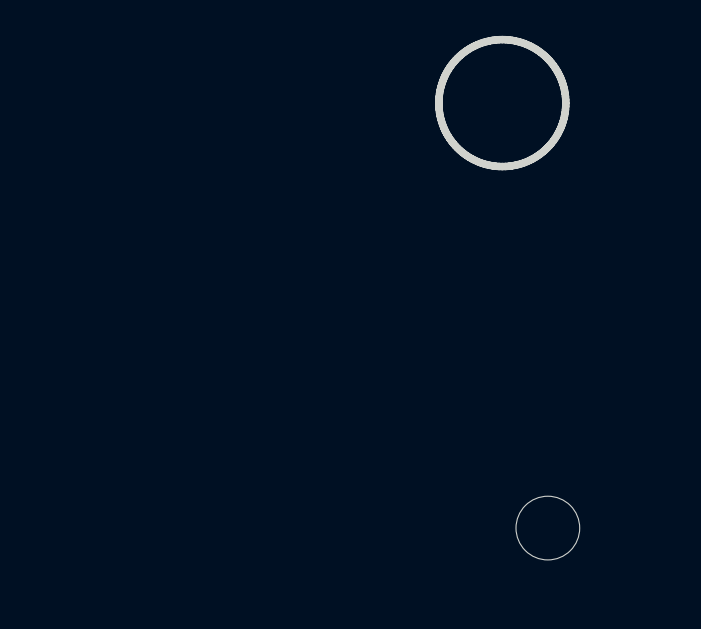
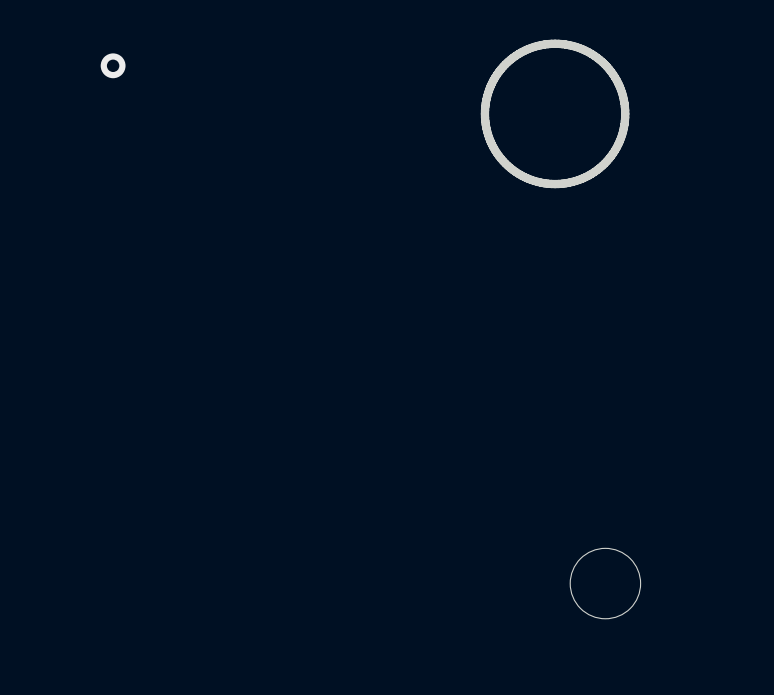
via: none -> (113, 65)

